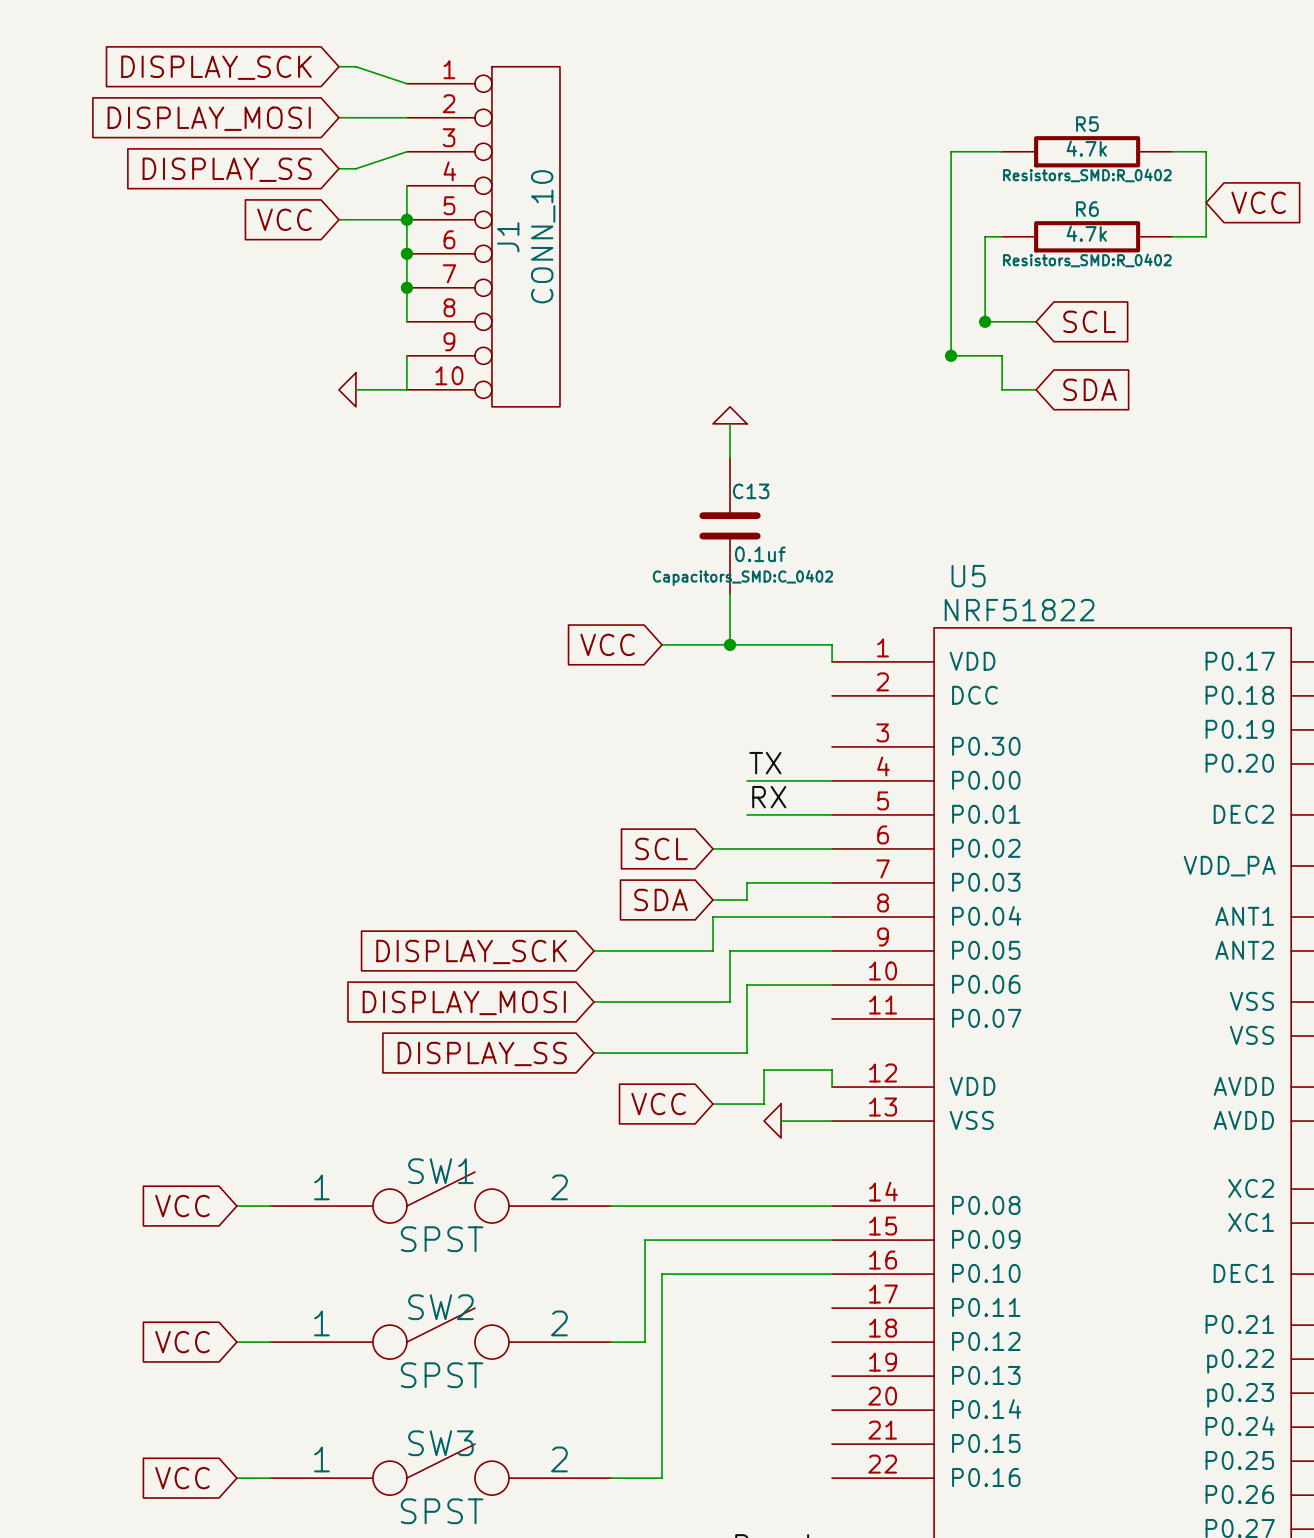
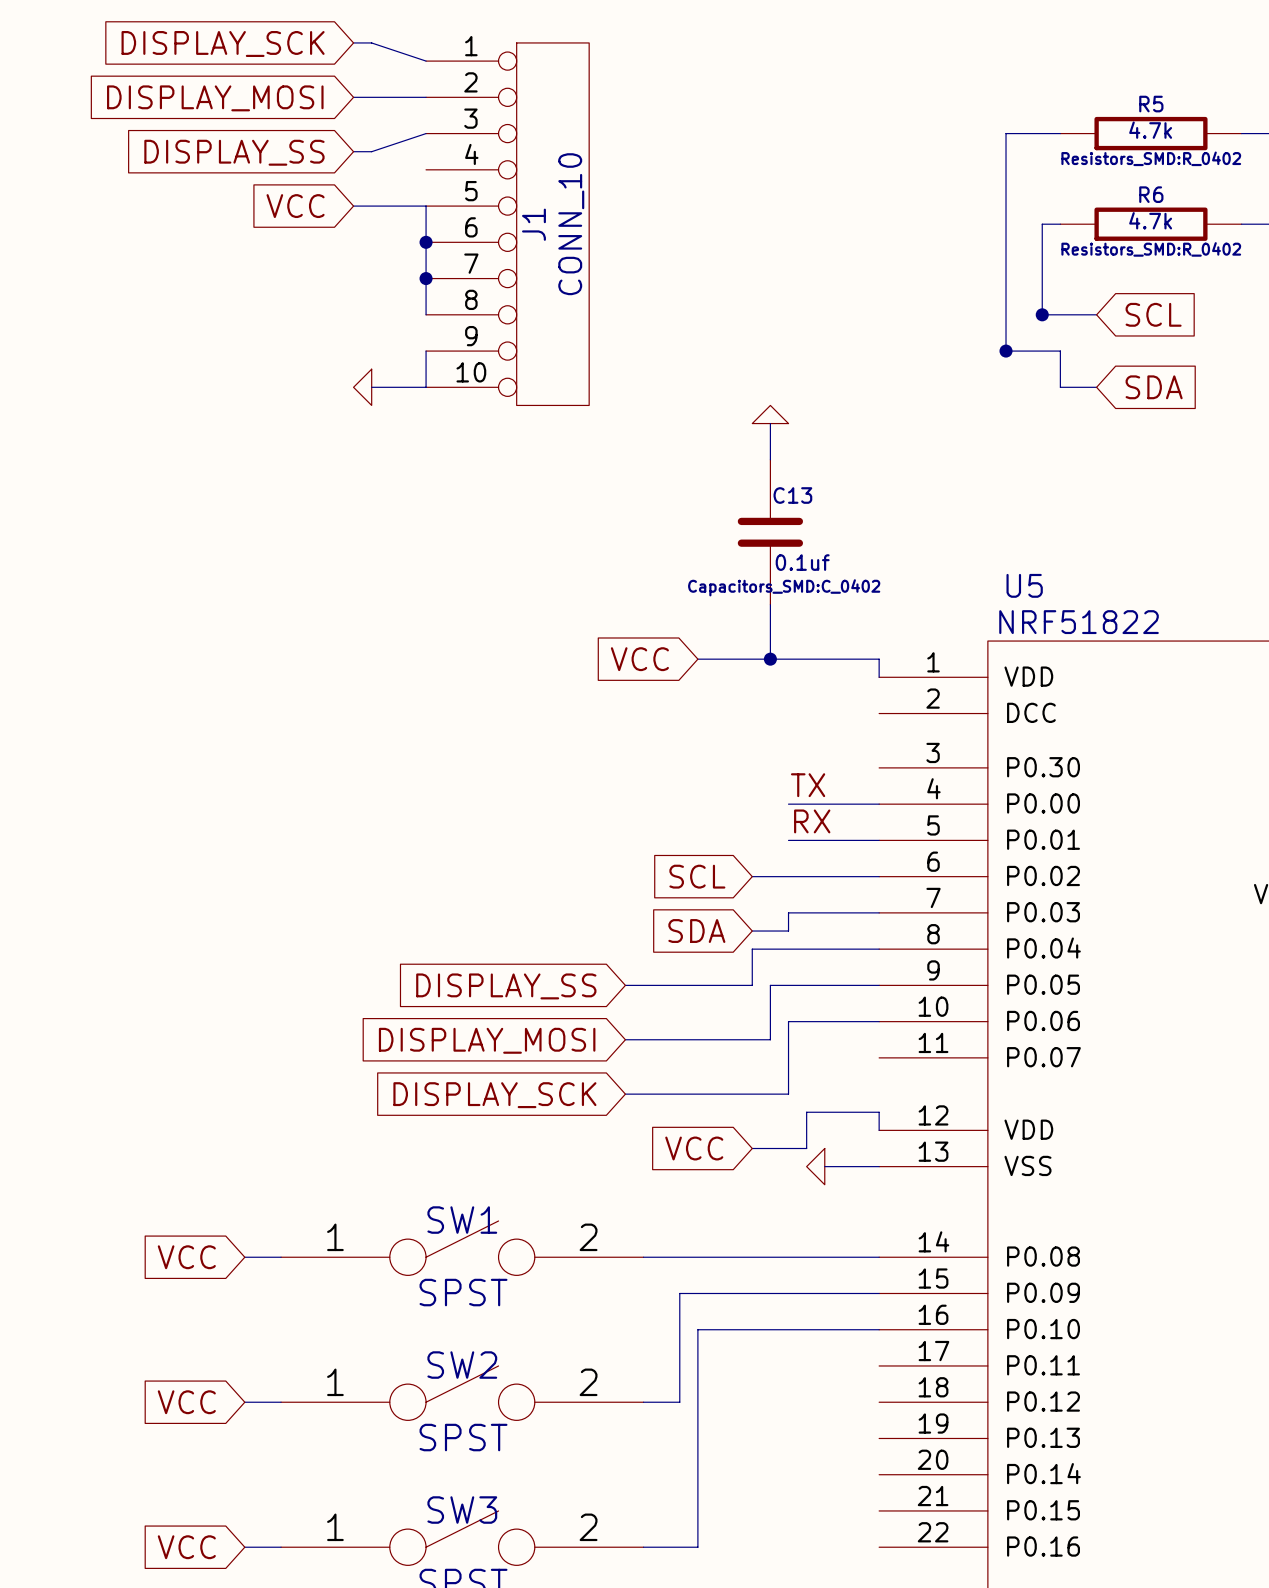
wire: (406, 185) (406, 219) -> none
junction: (406, 219) -> none
global label: DISPLAY_SCK (471, 951) -> DISPLAY_SS (506, 986)
global label: DISPLAY_SS (482, 1053) -> DISPLAY_SCK (494, 1095)

